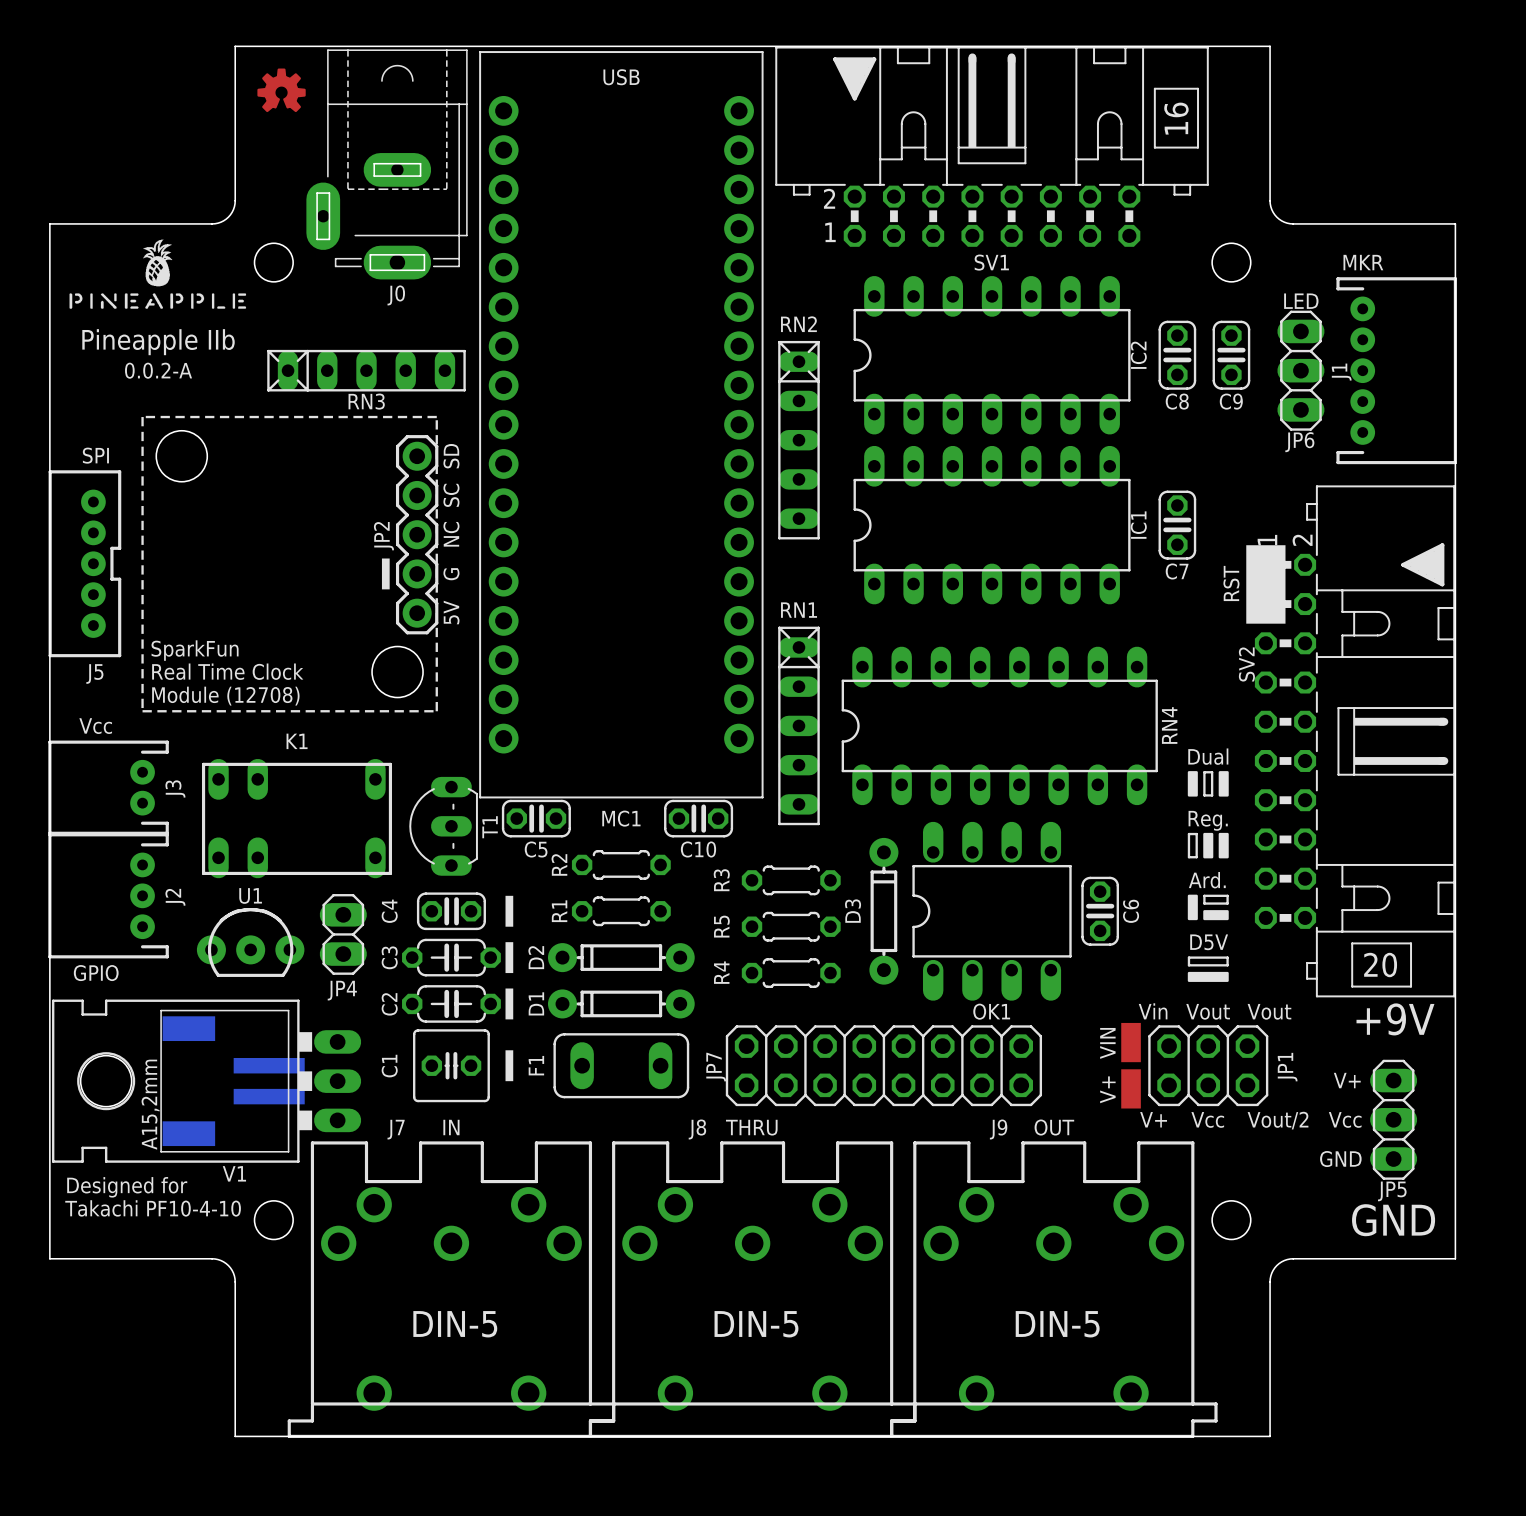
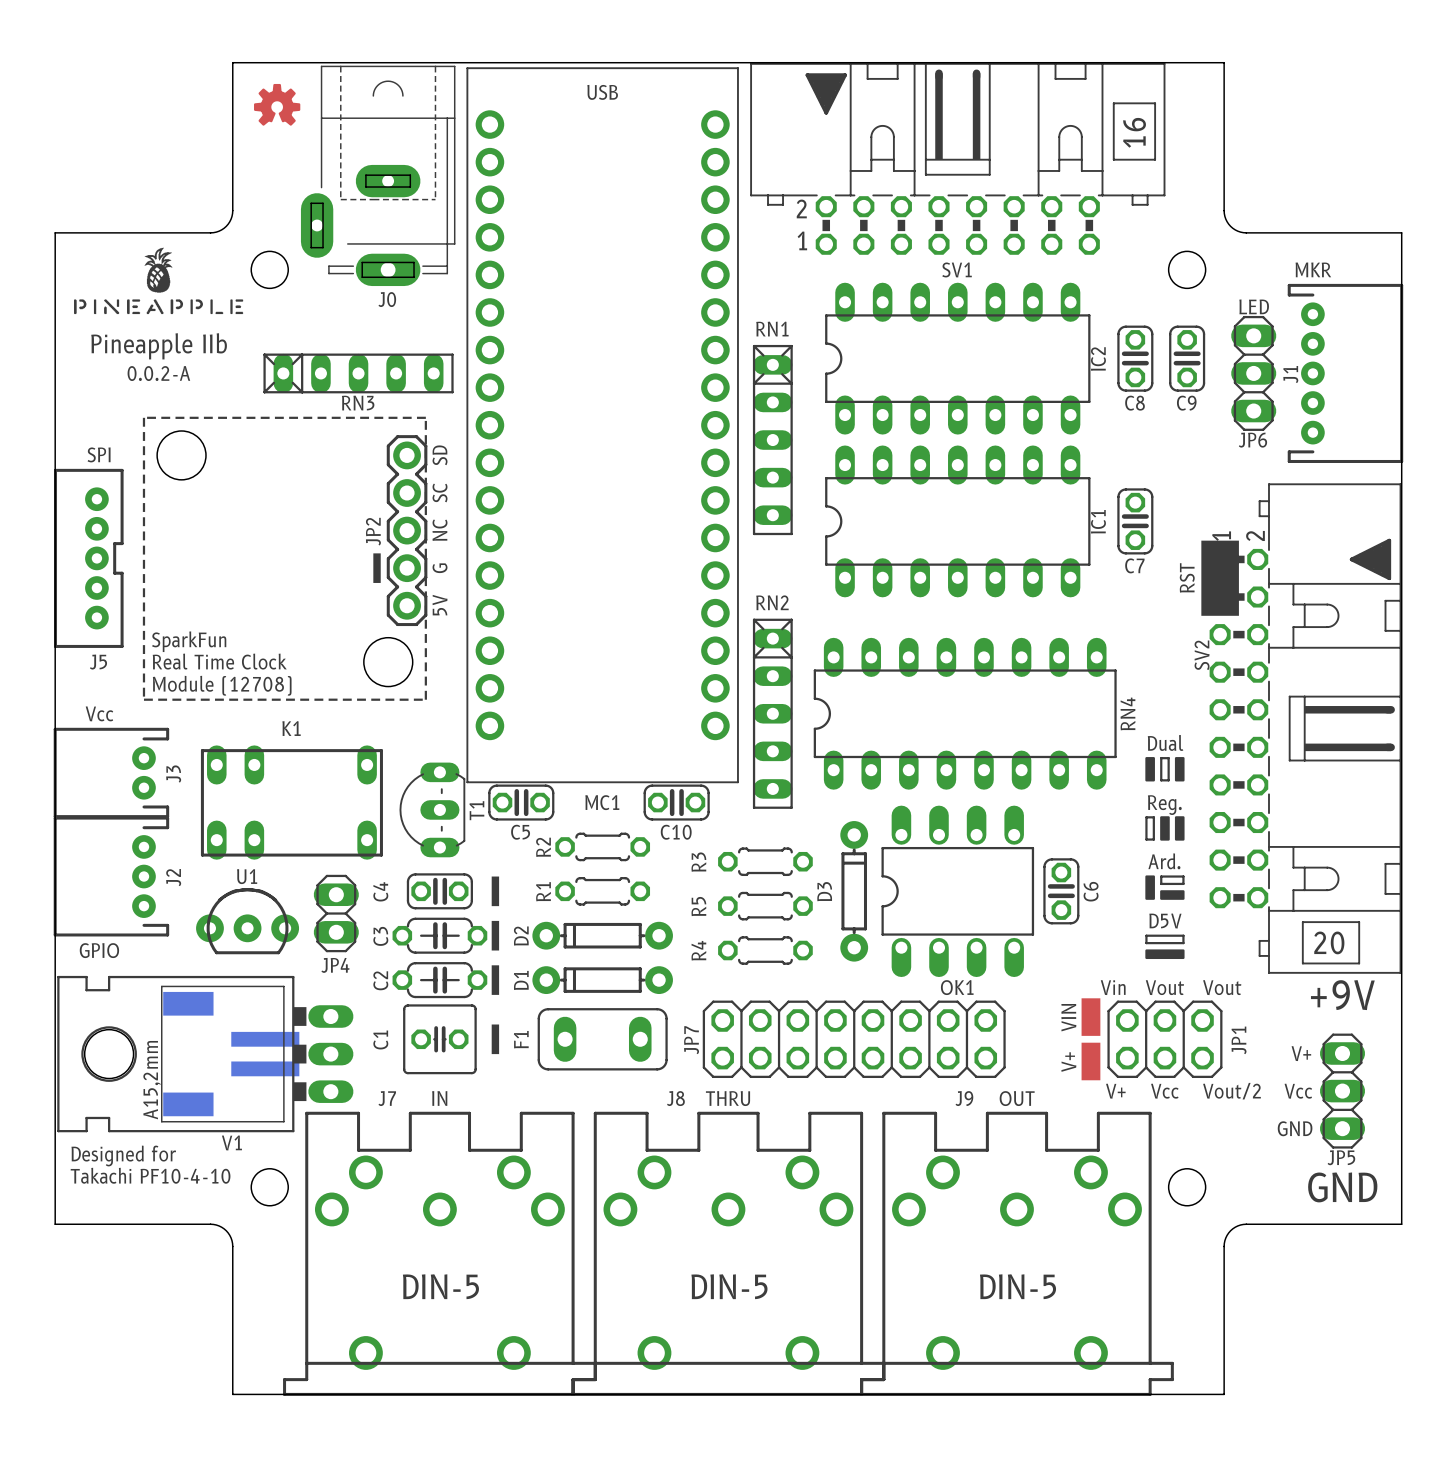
RN2 name: RN2 (798, 324) -> RN1 (772, 329)
RN1 name: RN1 (799, 610) -> RN2 (772, 602)

